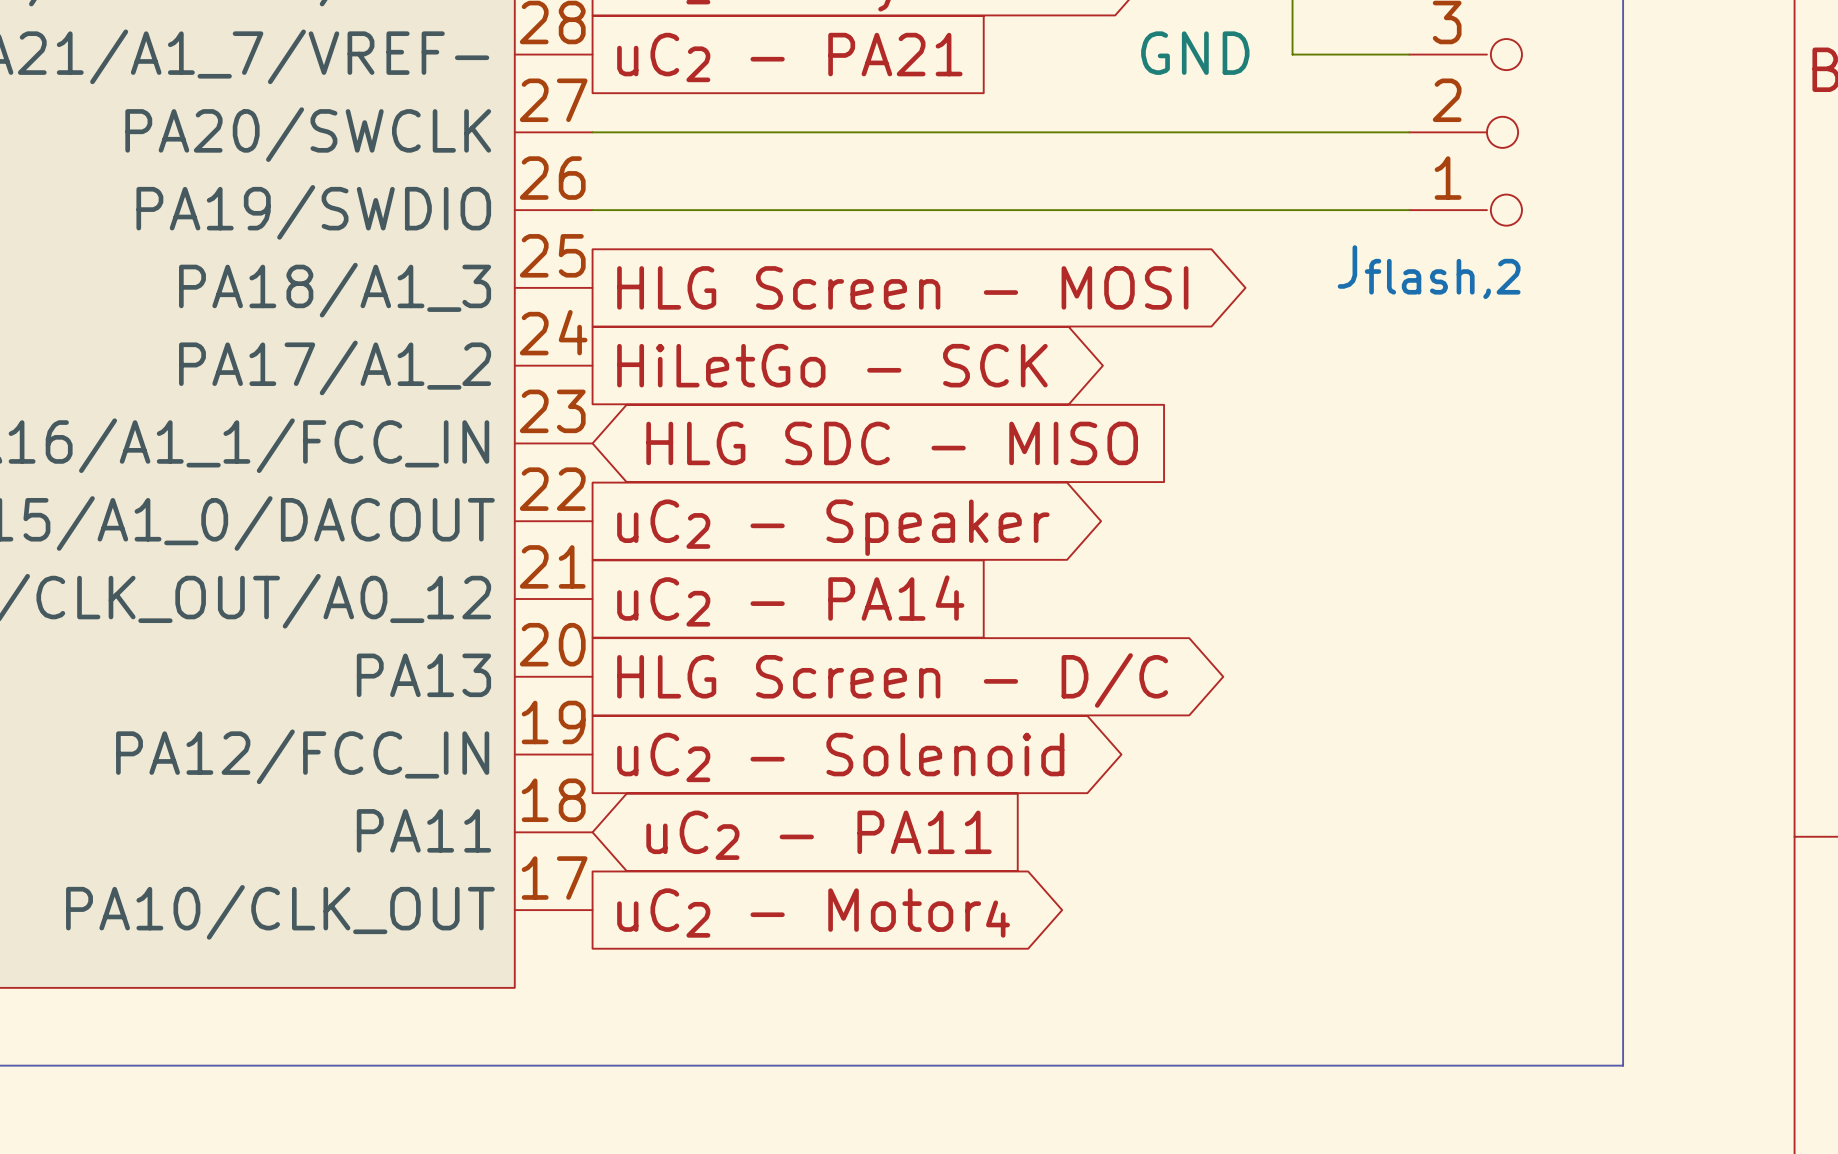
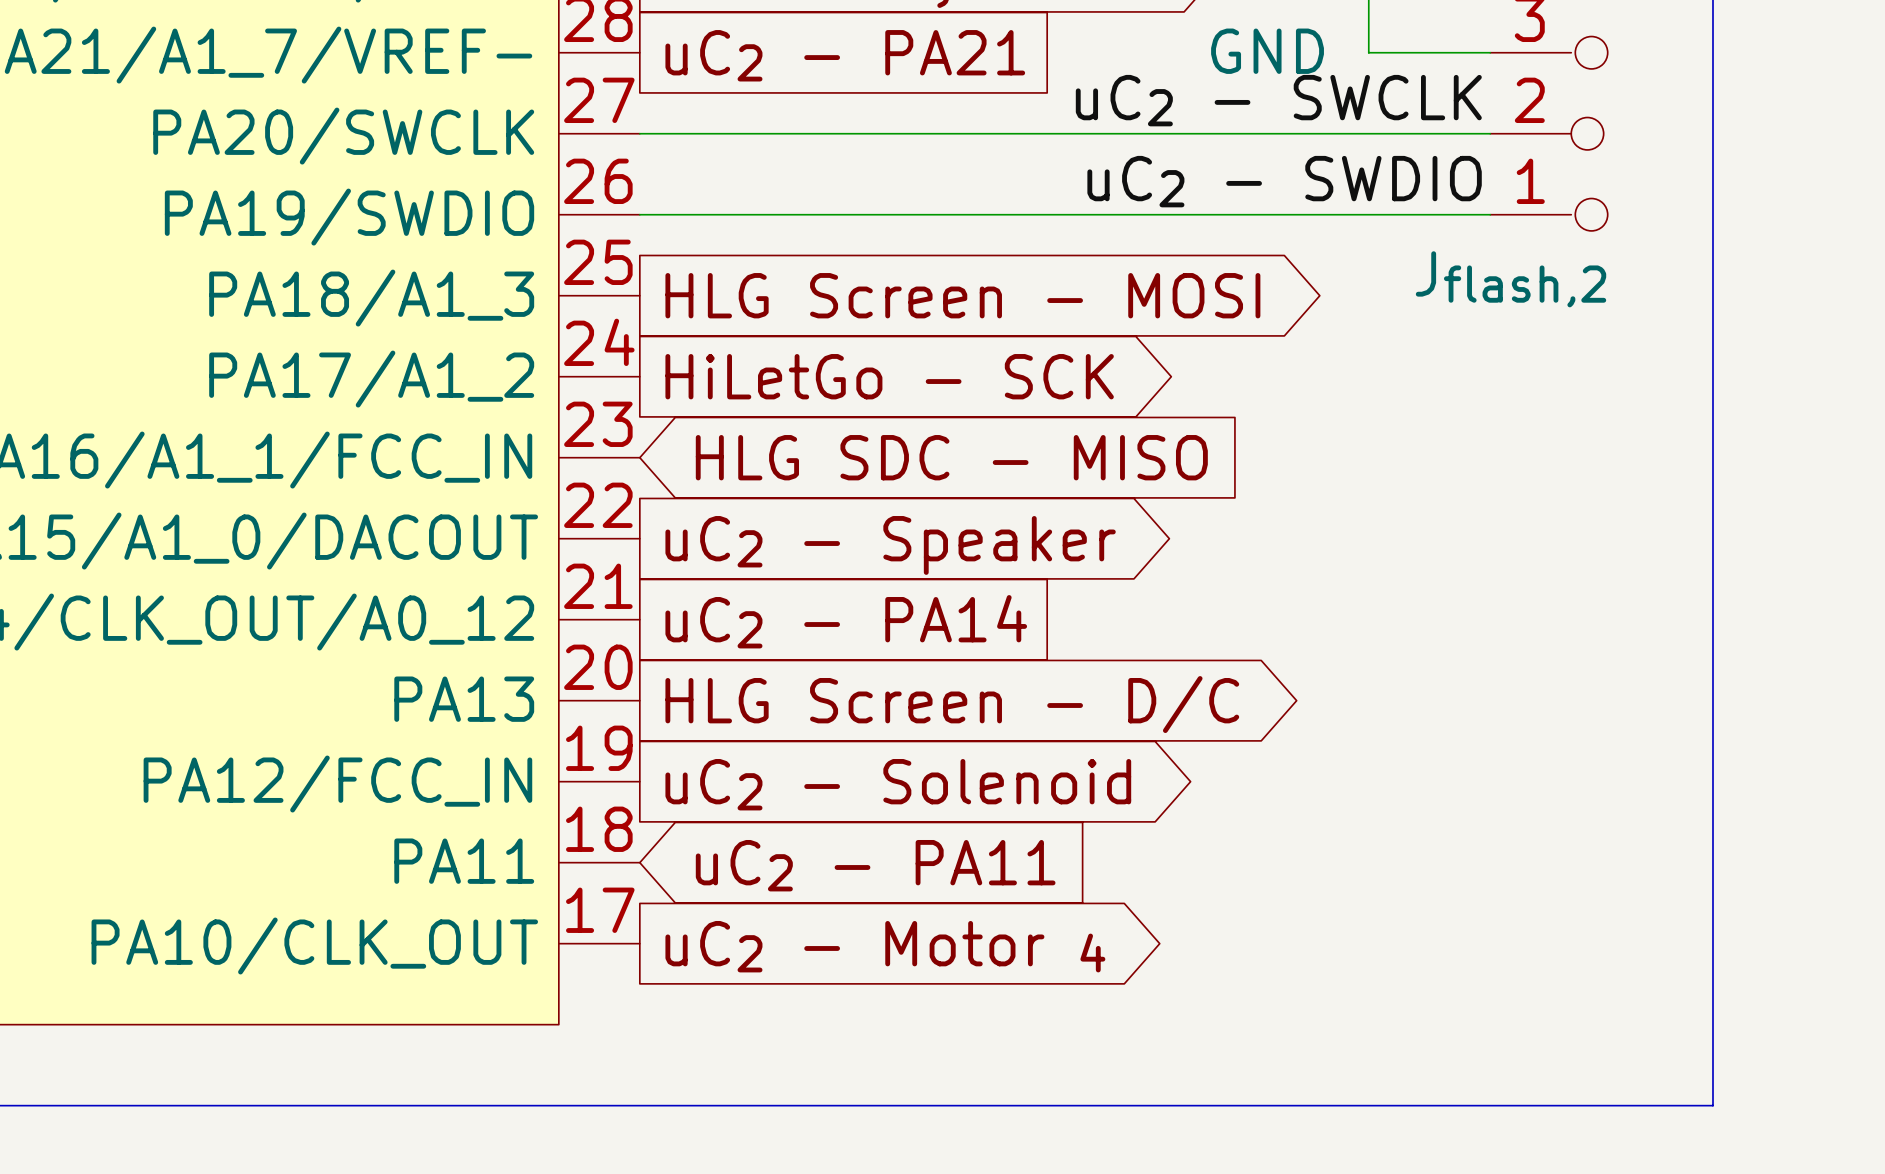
label: none -> uC2 - SWCLK (1278, 100)
label: none -> uC2 - SWDIO (1284, 181)
global label: uC2 - Motor4 (813, 913) -> uC2 - Motor 4 (885, 946)

